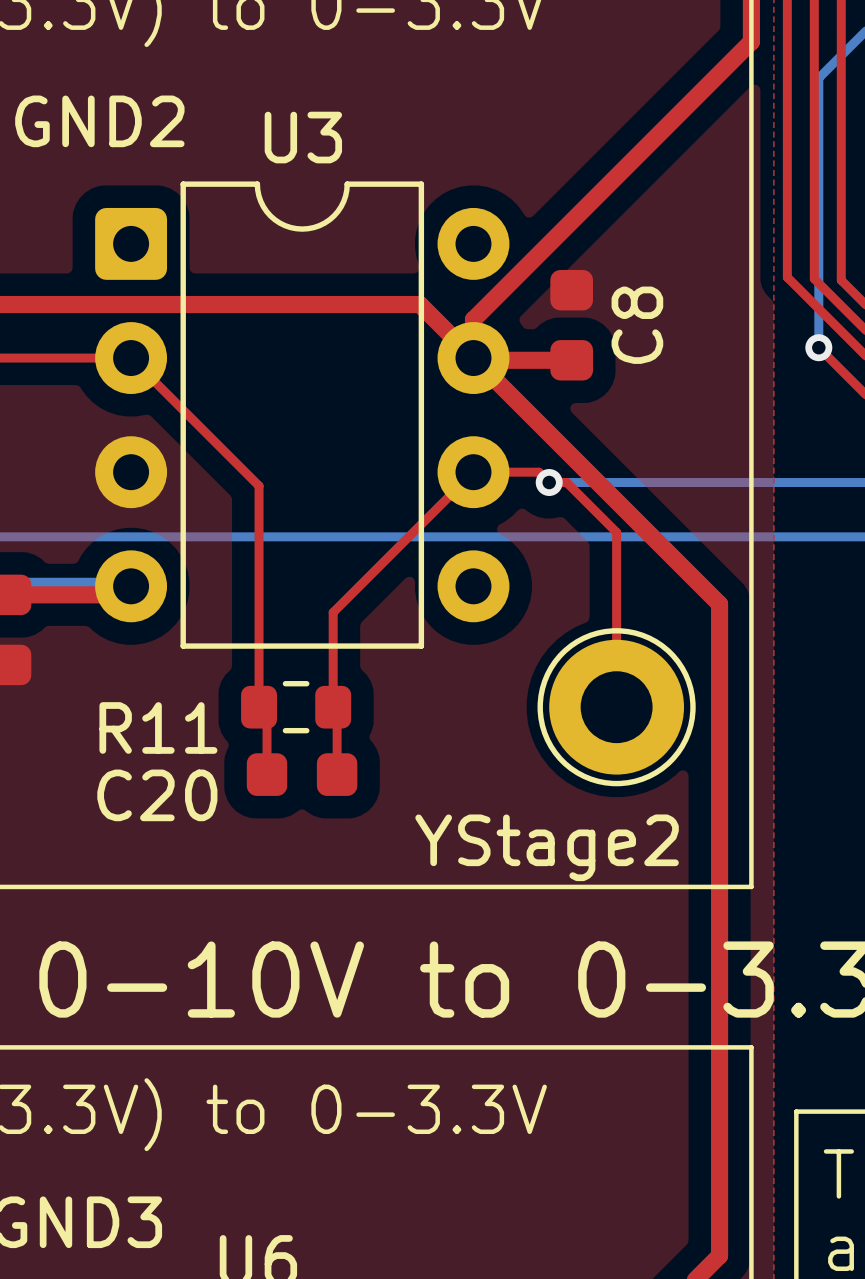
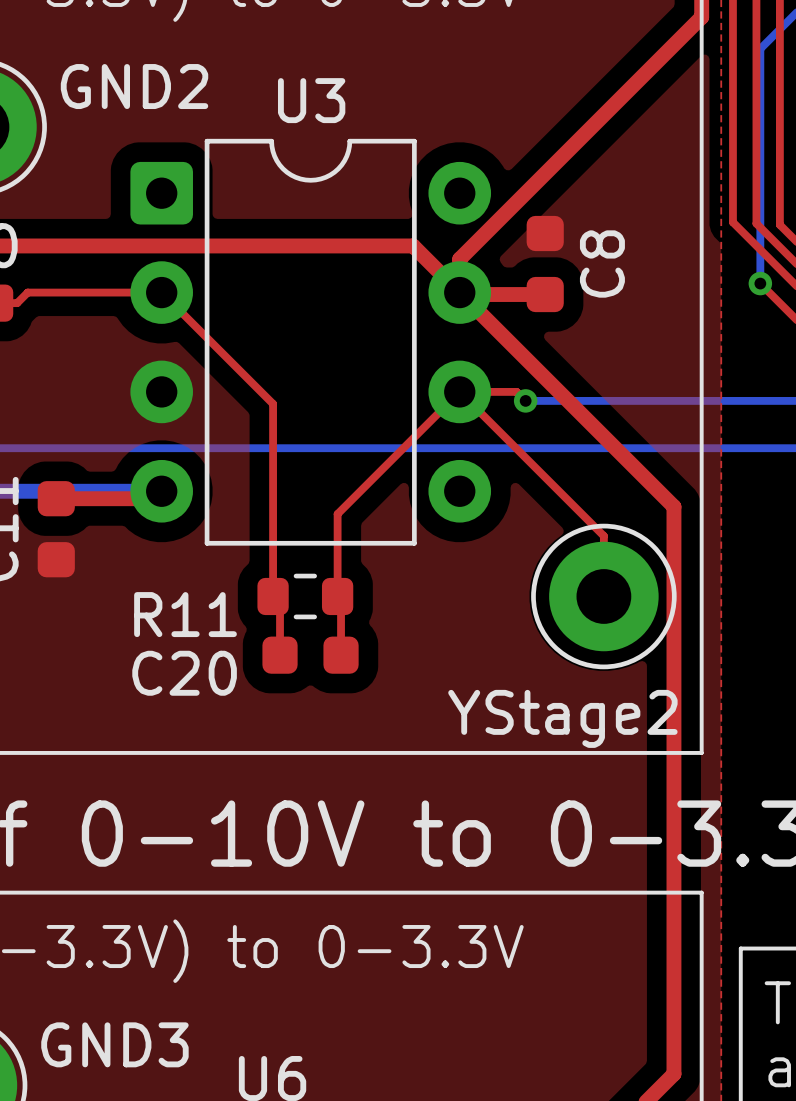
top track: none -> (459, 391) (603, 536) (603, 596)
top track: (549, 482) (566, 482) (616, 532) (616, 707) -> none
YStage2 footprint: [537, 628, 696, 787] -> [531, 523, 677, 670]
YStage2 name position: YStage2 (547, 847) -> YStage2 (562, 718)

